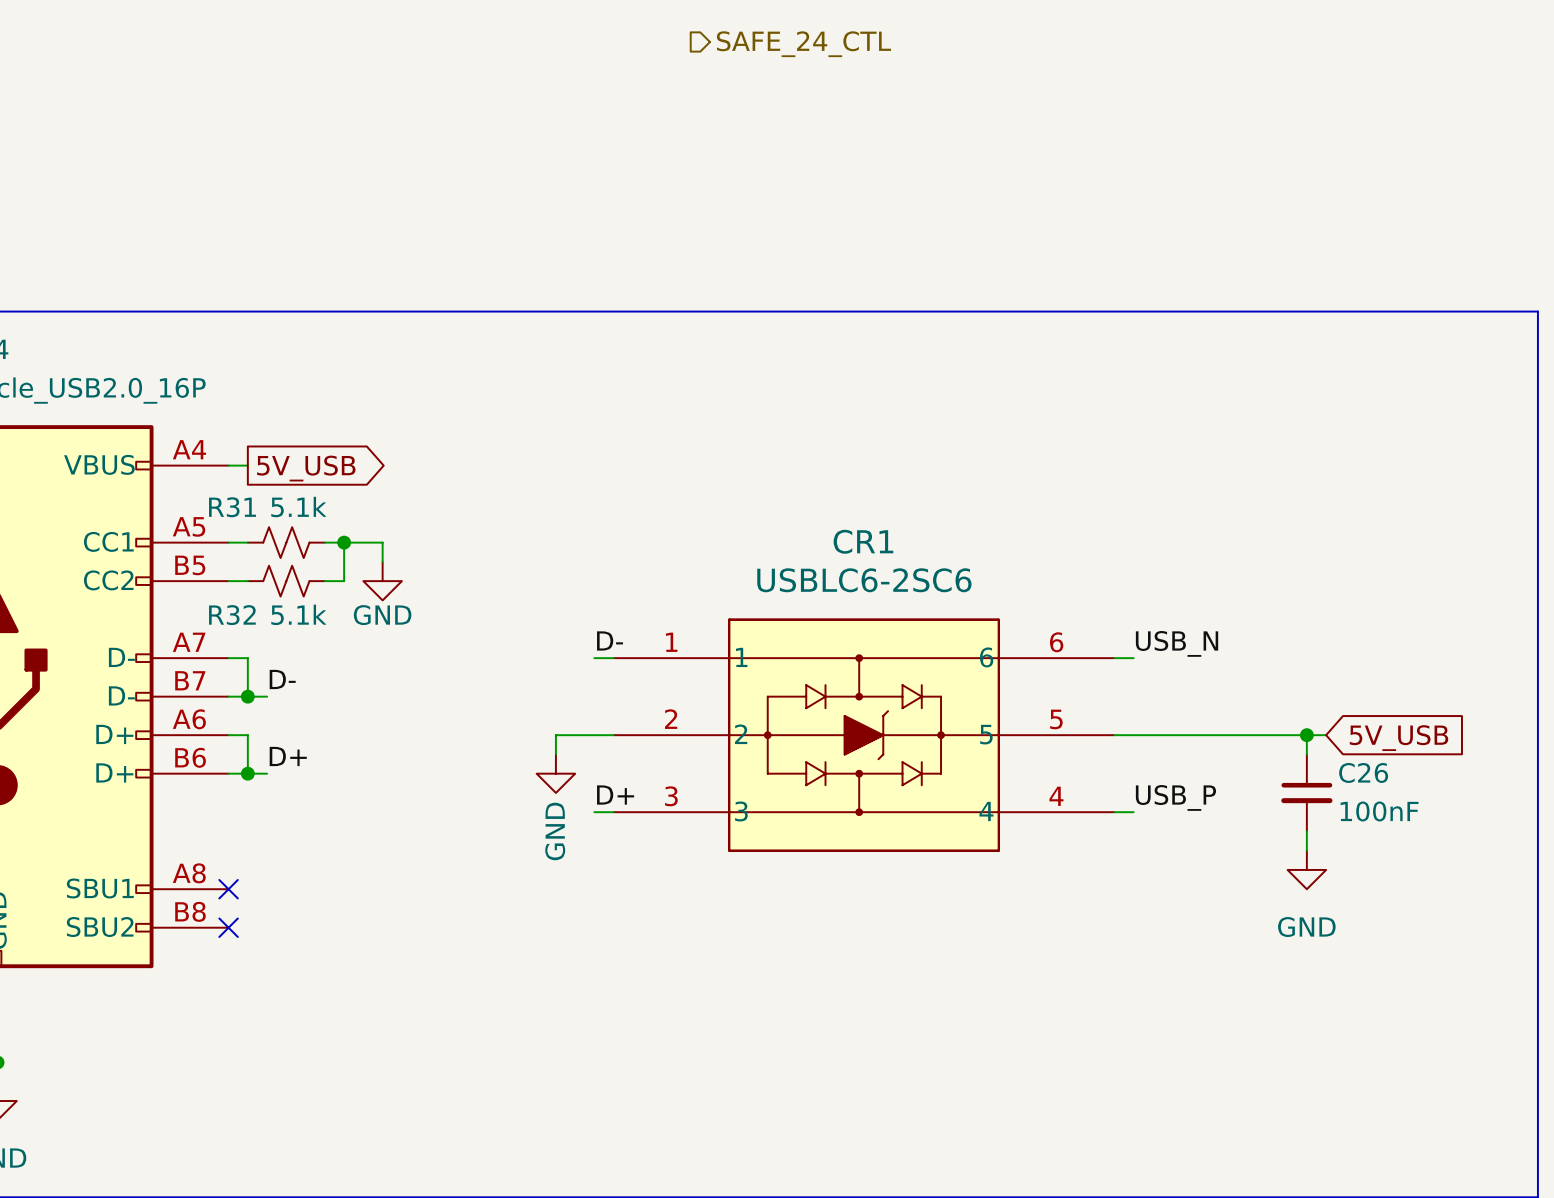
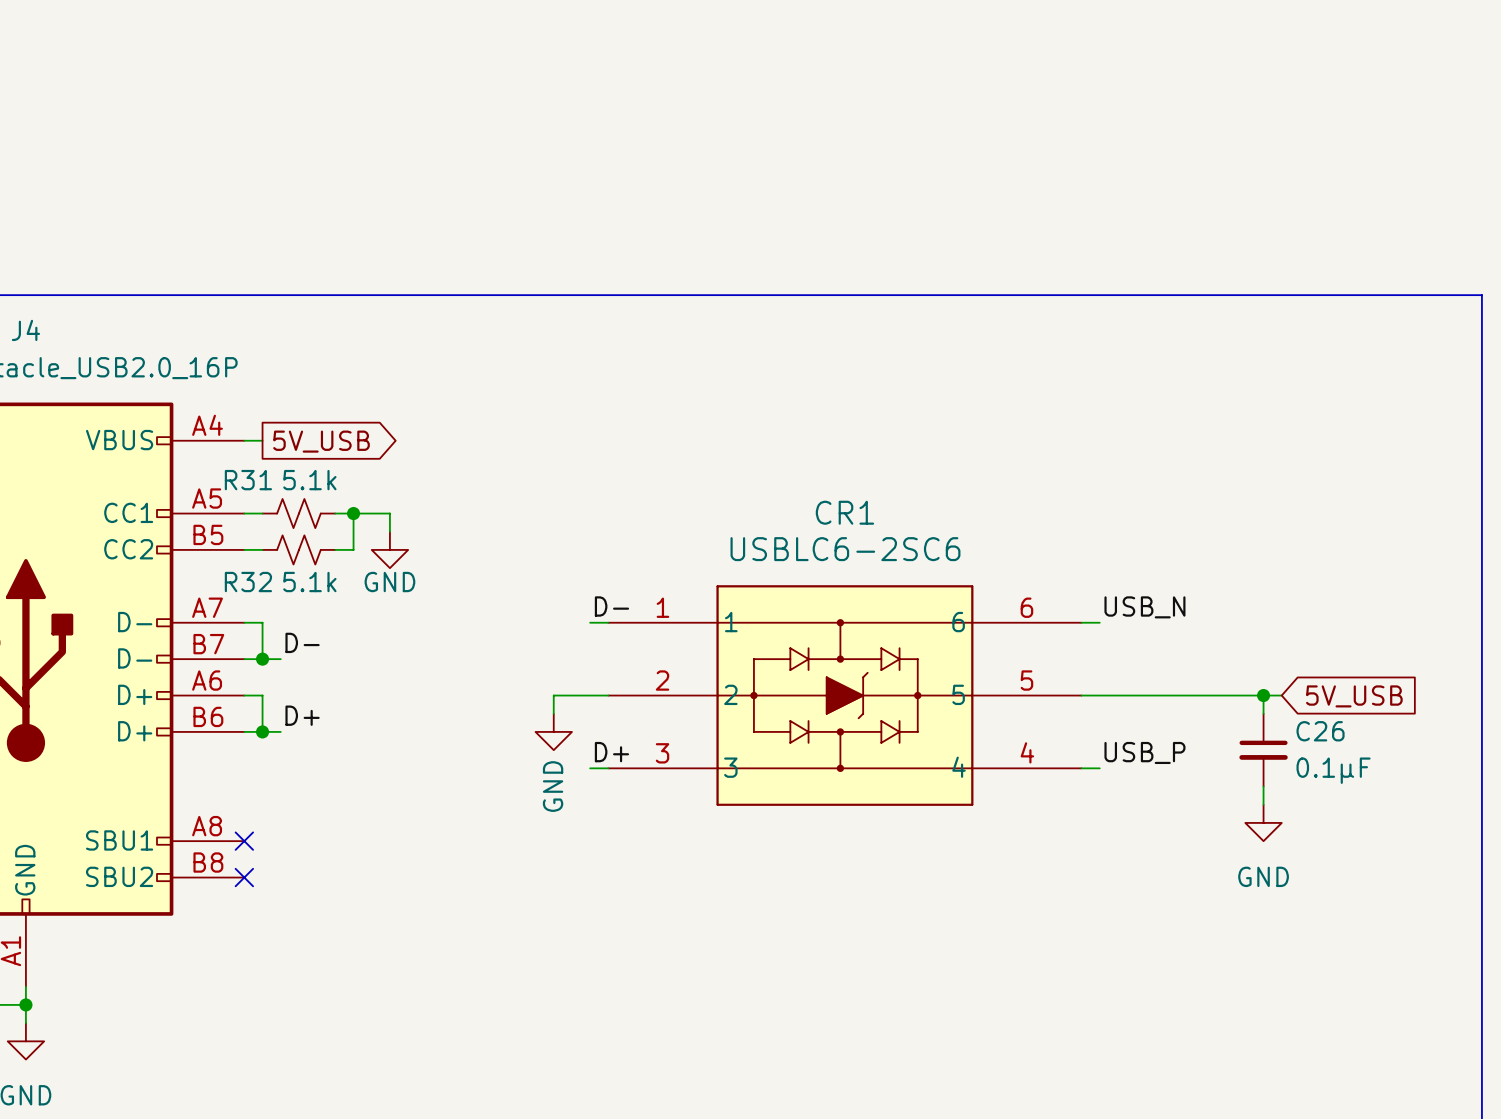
hierarchical label: SAFE_24_CTL (803, 44) -> none
C26 value: 100nF (1379, 811) -> 0.1μF (1333, 770)

